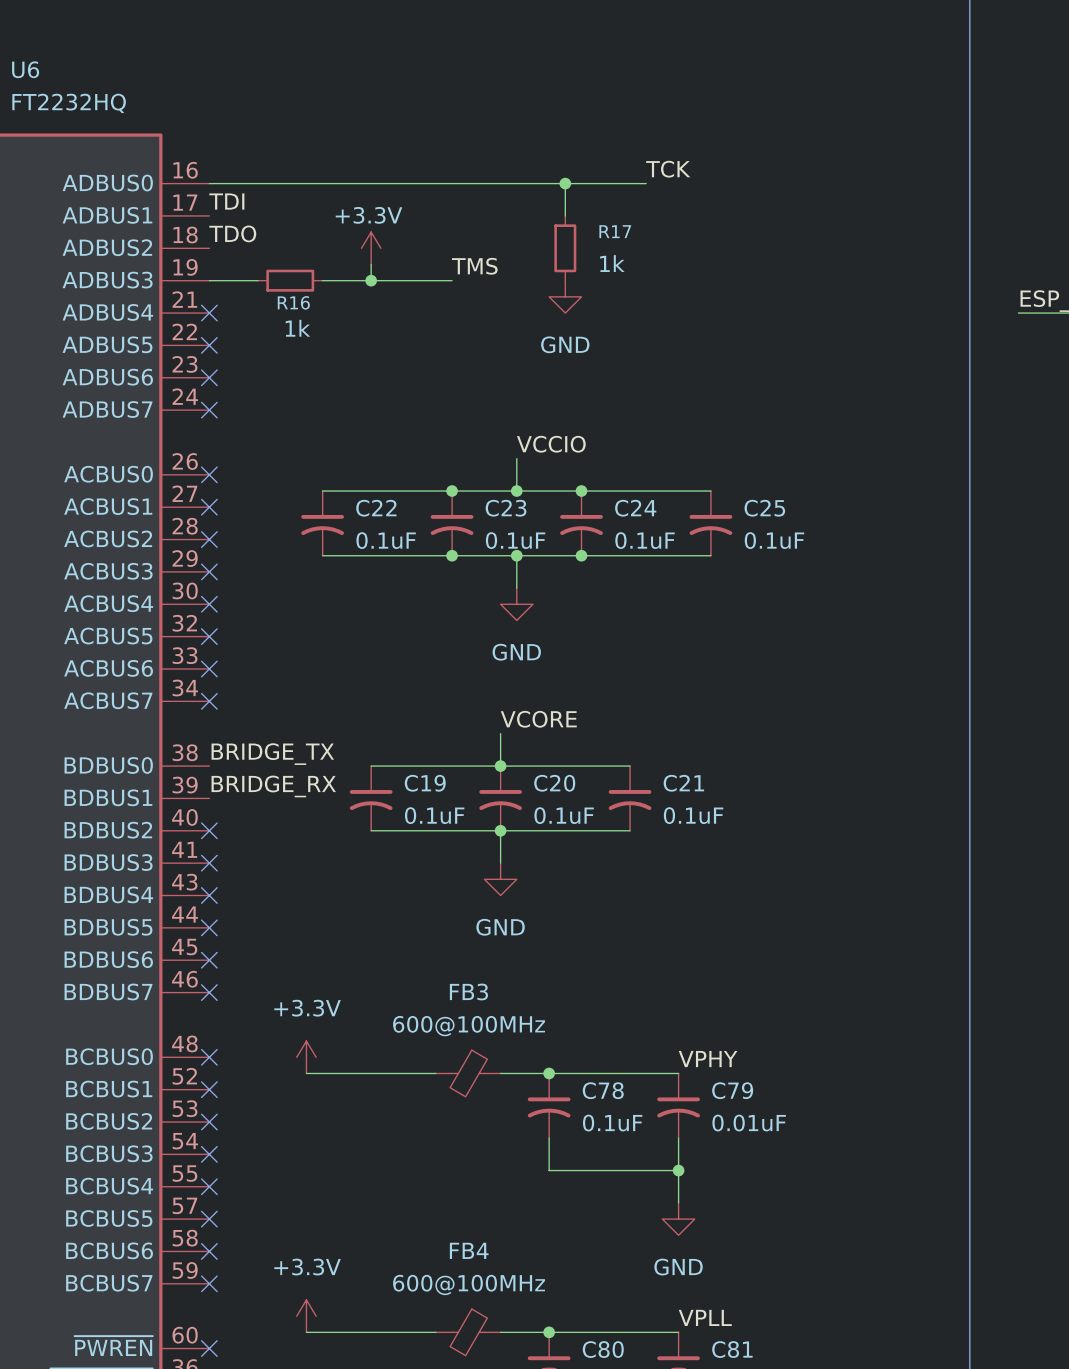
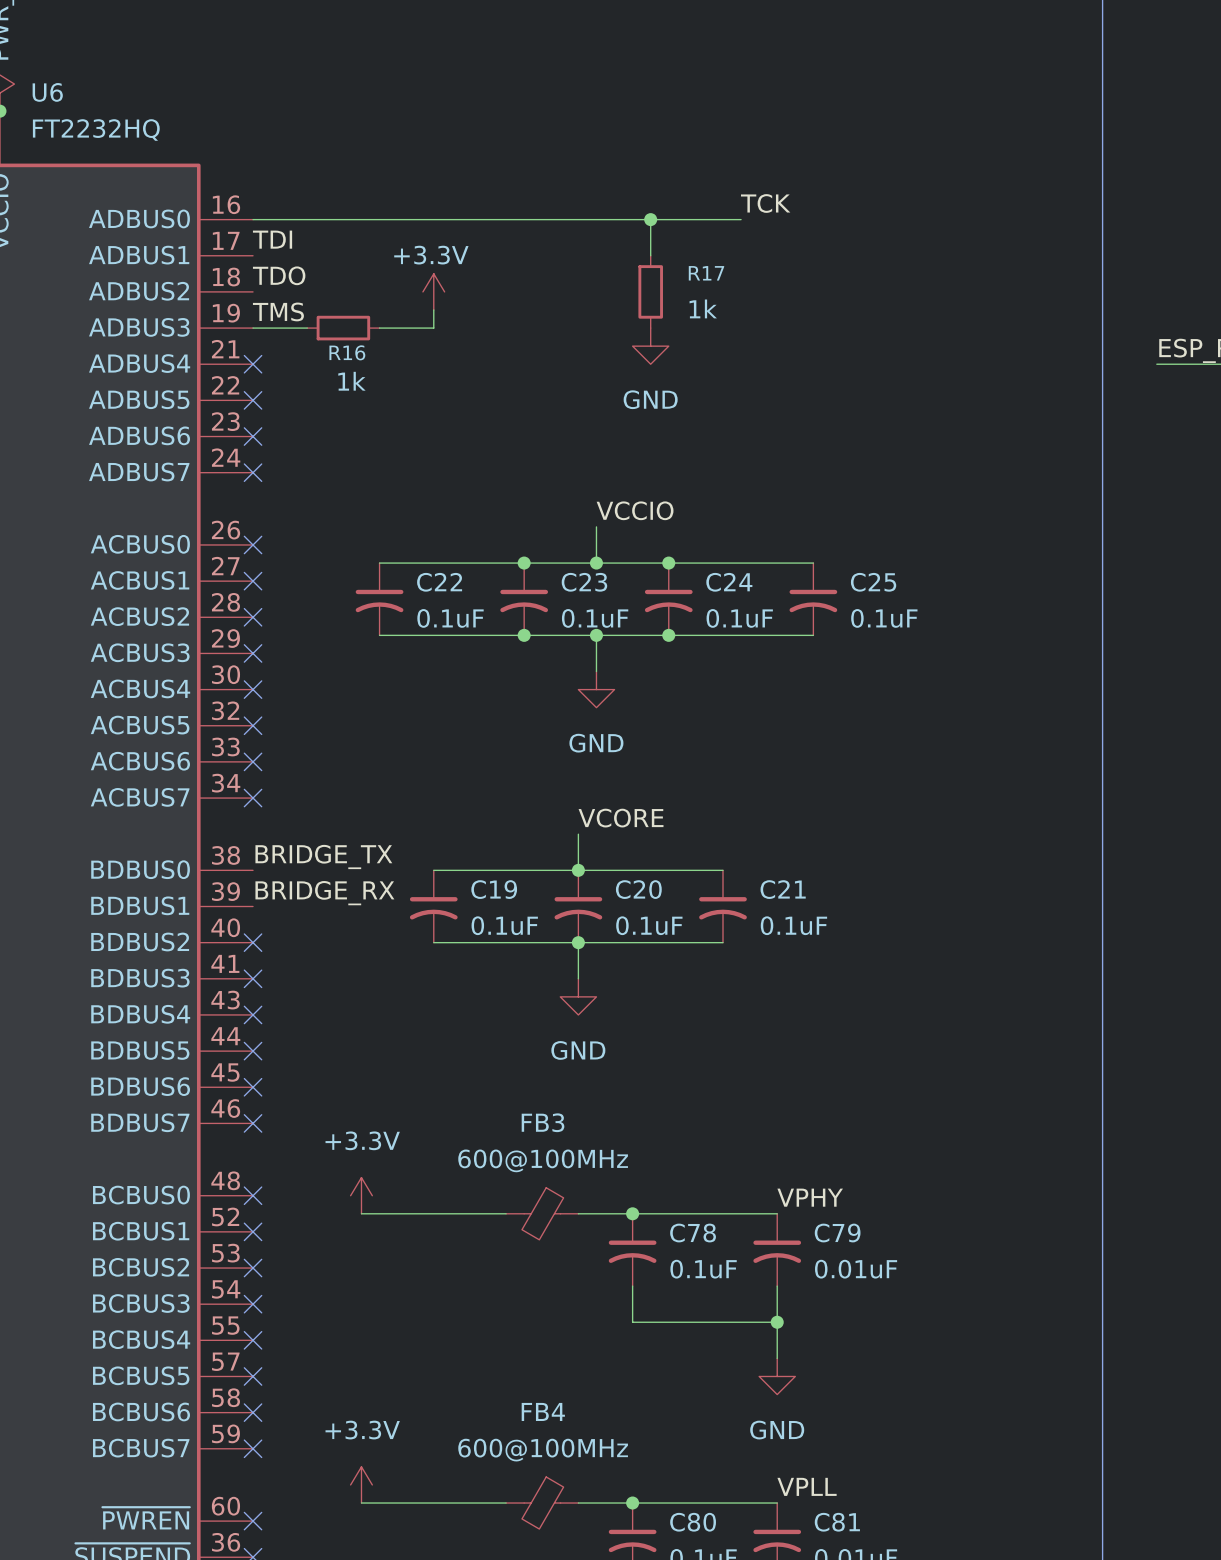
label position: TMS (474, 266) -> TMS (278, 311)
wire: (371, 280) (452, 280) -> none
junction: (371, 280) -> none

